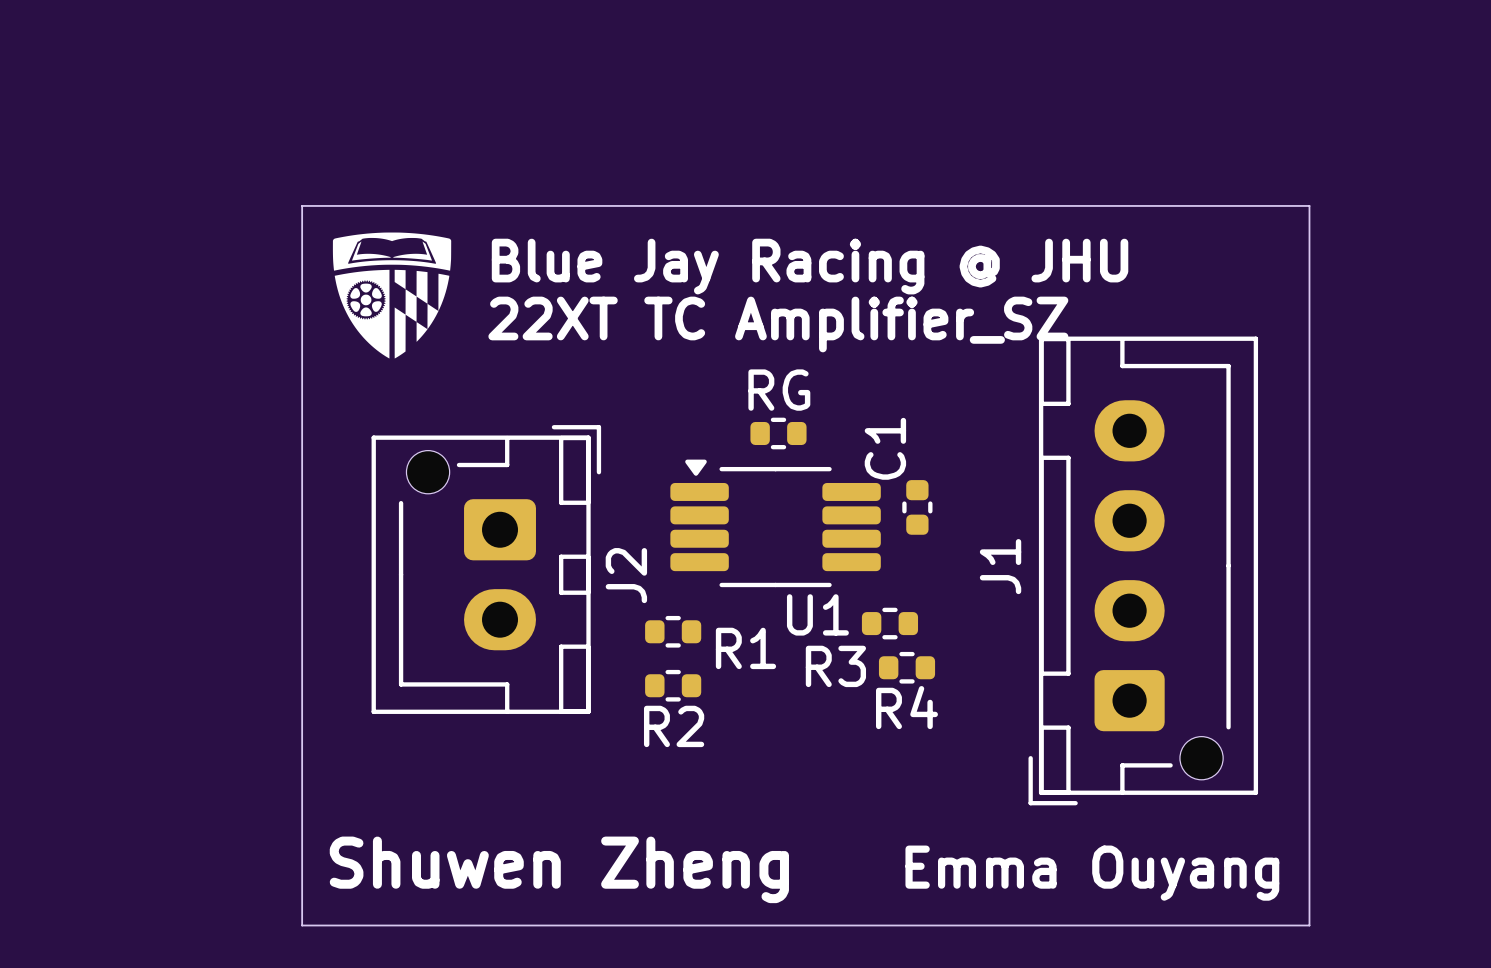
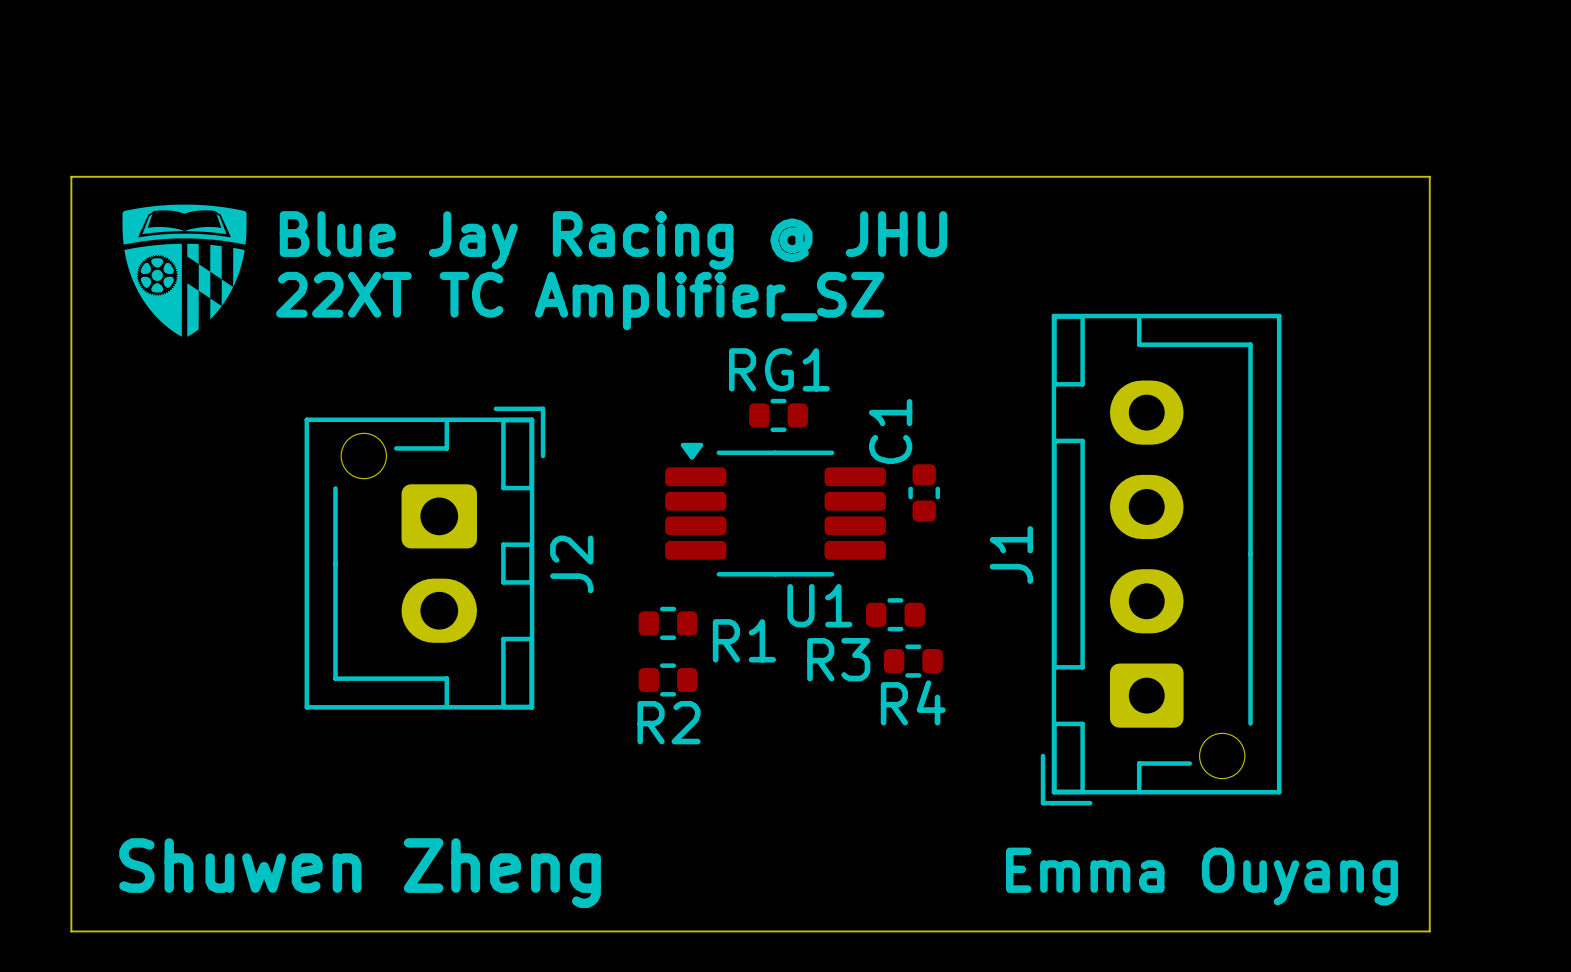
board edge: (302, 205) (302, 925) -> (278, 176) (71, 176) (71, 931) (278, 931)
board edge: (1309, 205) (1309, 925) -> (1335, 176) (1429, 176) (1429, 931) (1335, 931)
text position: Blue Jay Racing @ JHU (810, 266) -> Blue Jay Racing @ JHU (613, 240)
drawing position: (392, 295) -> (184, 270)
text position: 22XT TC Amplifier_SZ (778, 324) -> 22XT TC Amplifier_SZ (580, 301)
RG name: RG (779, 390) -> RG1 (779, 369)
J2 position: (486, 569) -> (424, 558)
text position: Shuwen Zheng (559, 869) -> Shuwen Zheng (360, 873)
text position: Emma Ouyang (1092, 873) -> Emma Ouyang (1202, 876)

